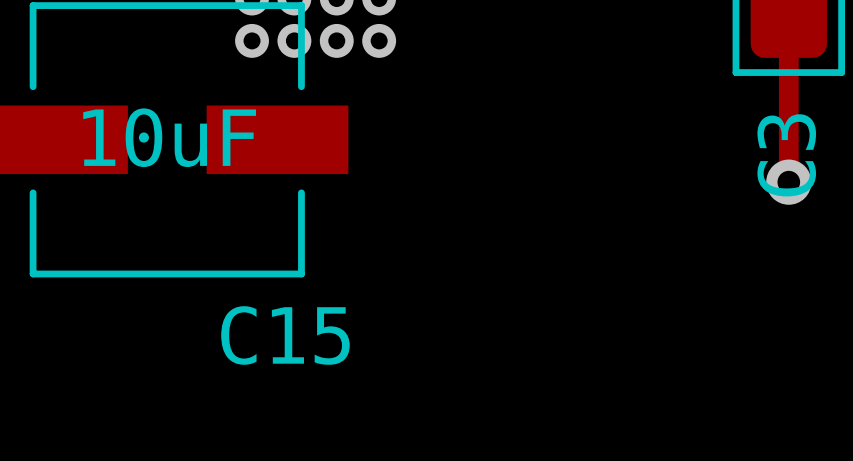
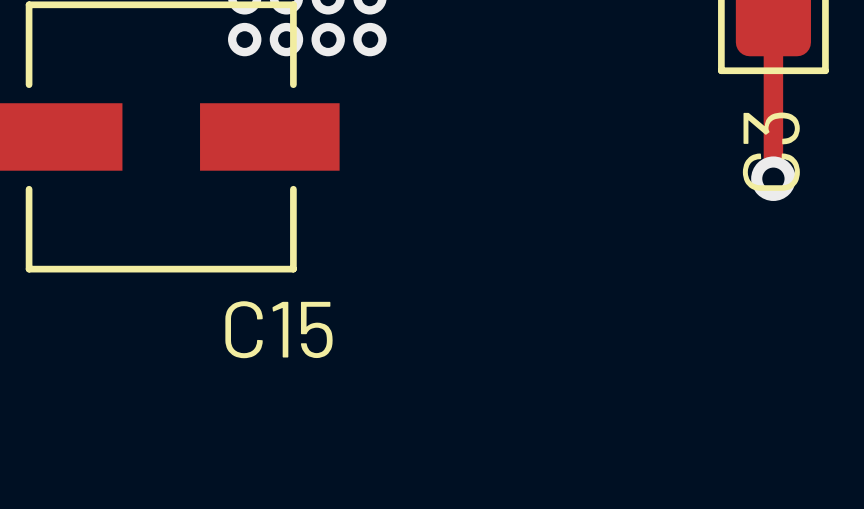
C15 value: 10uF (169, 137) -> none

